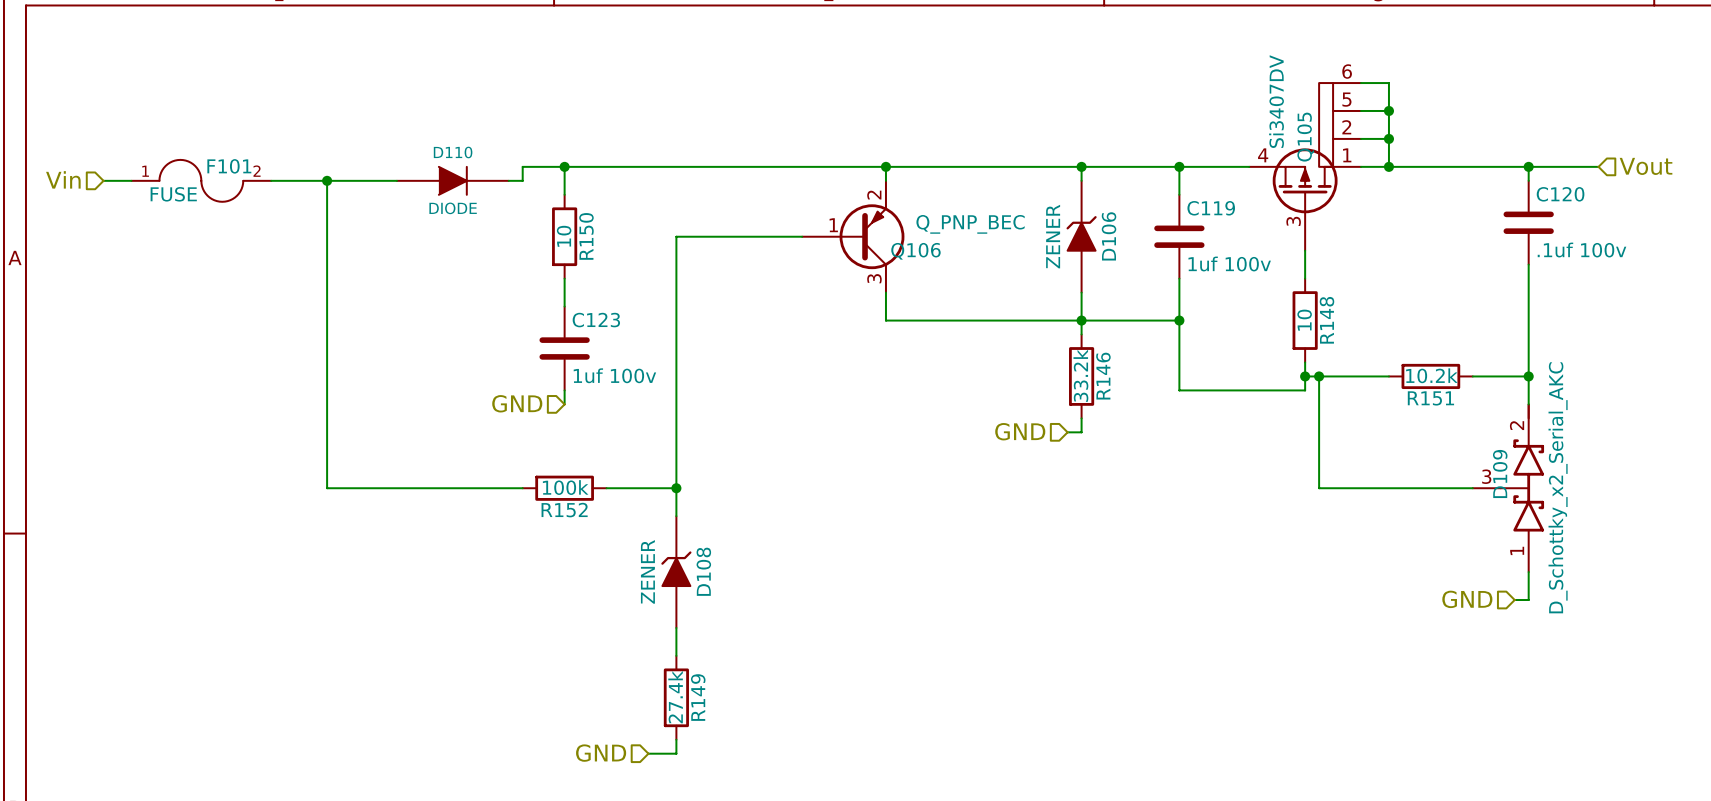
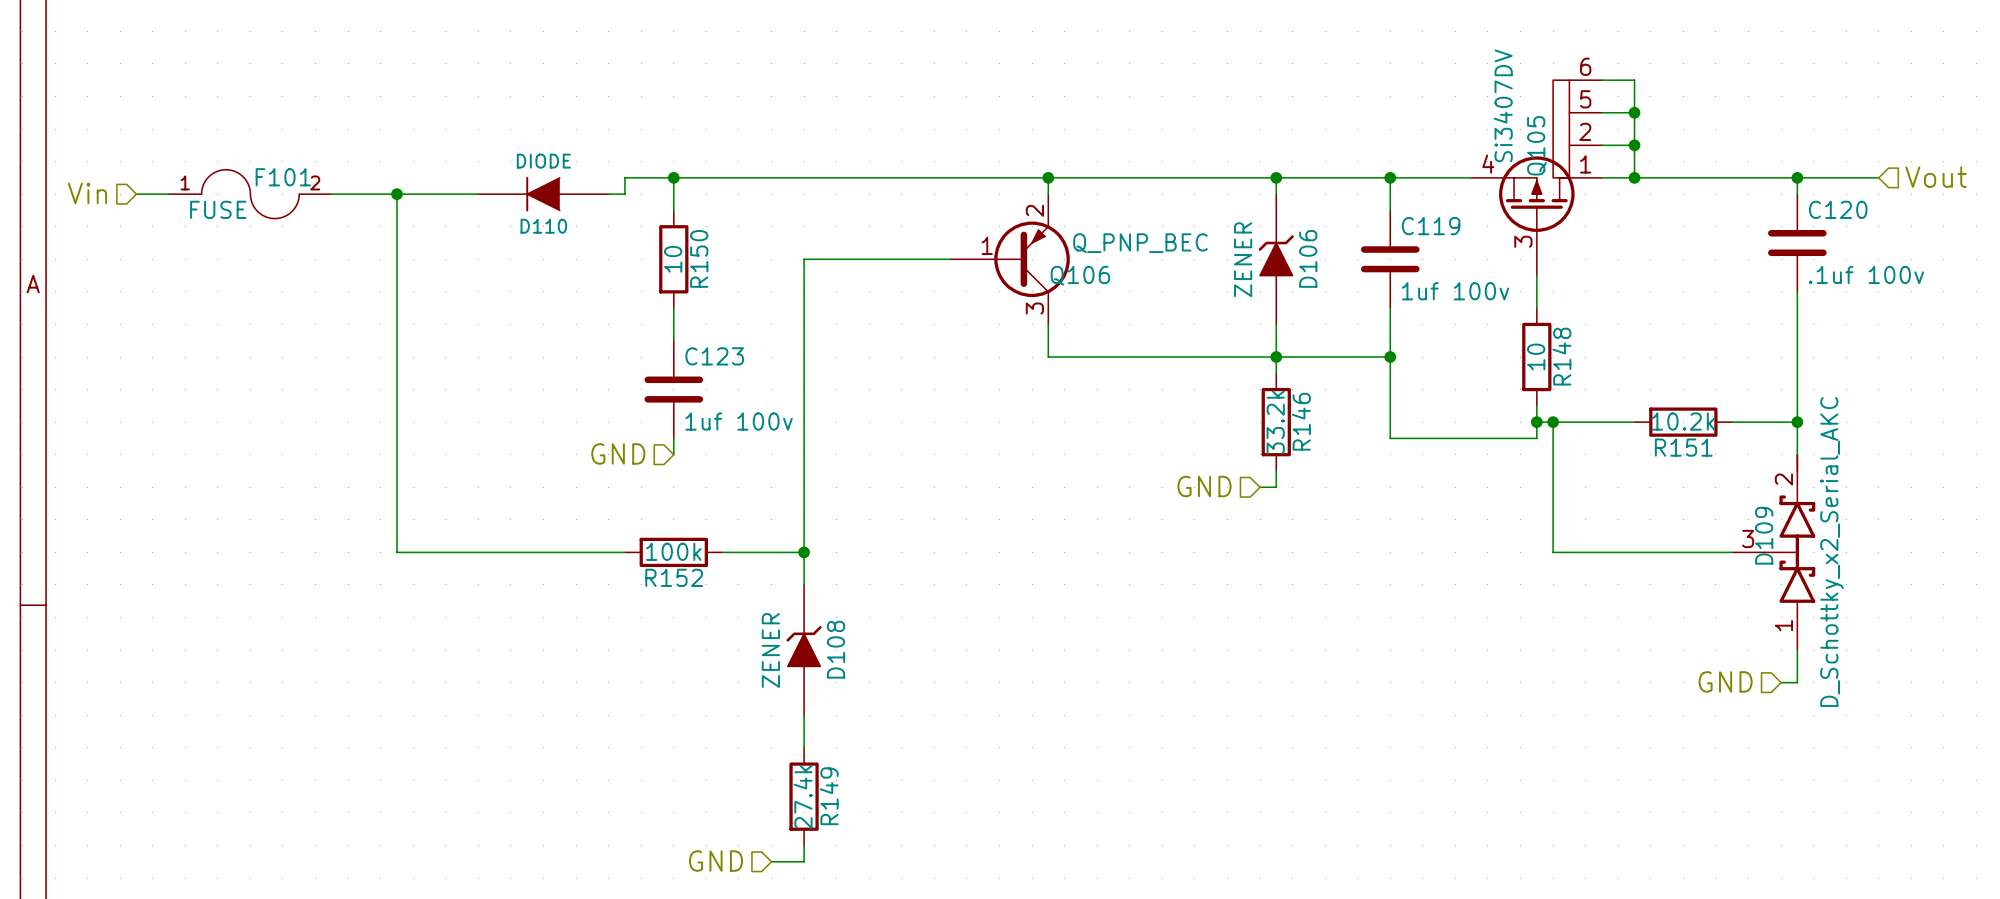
D110 rotation: 0° (453, 180) -> 180° (543, 194)

